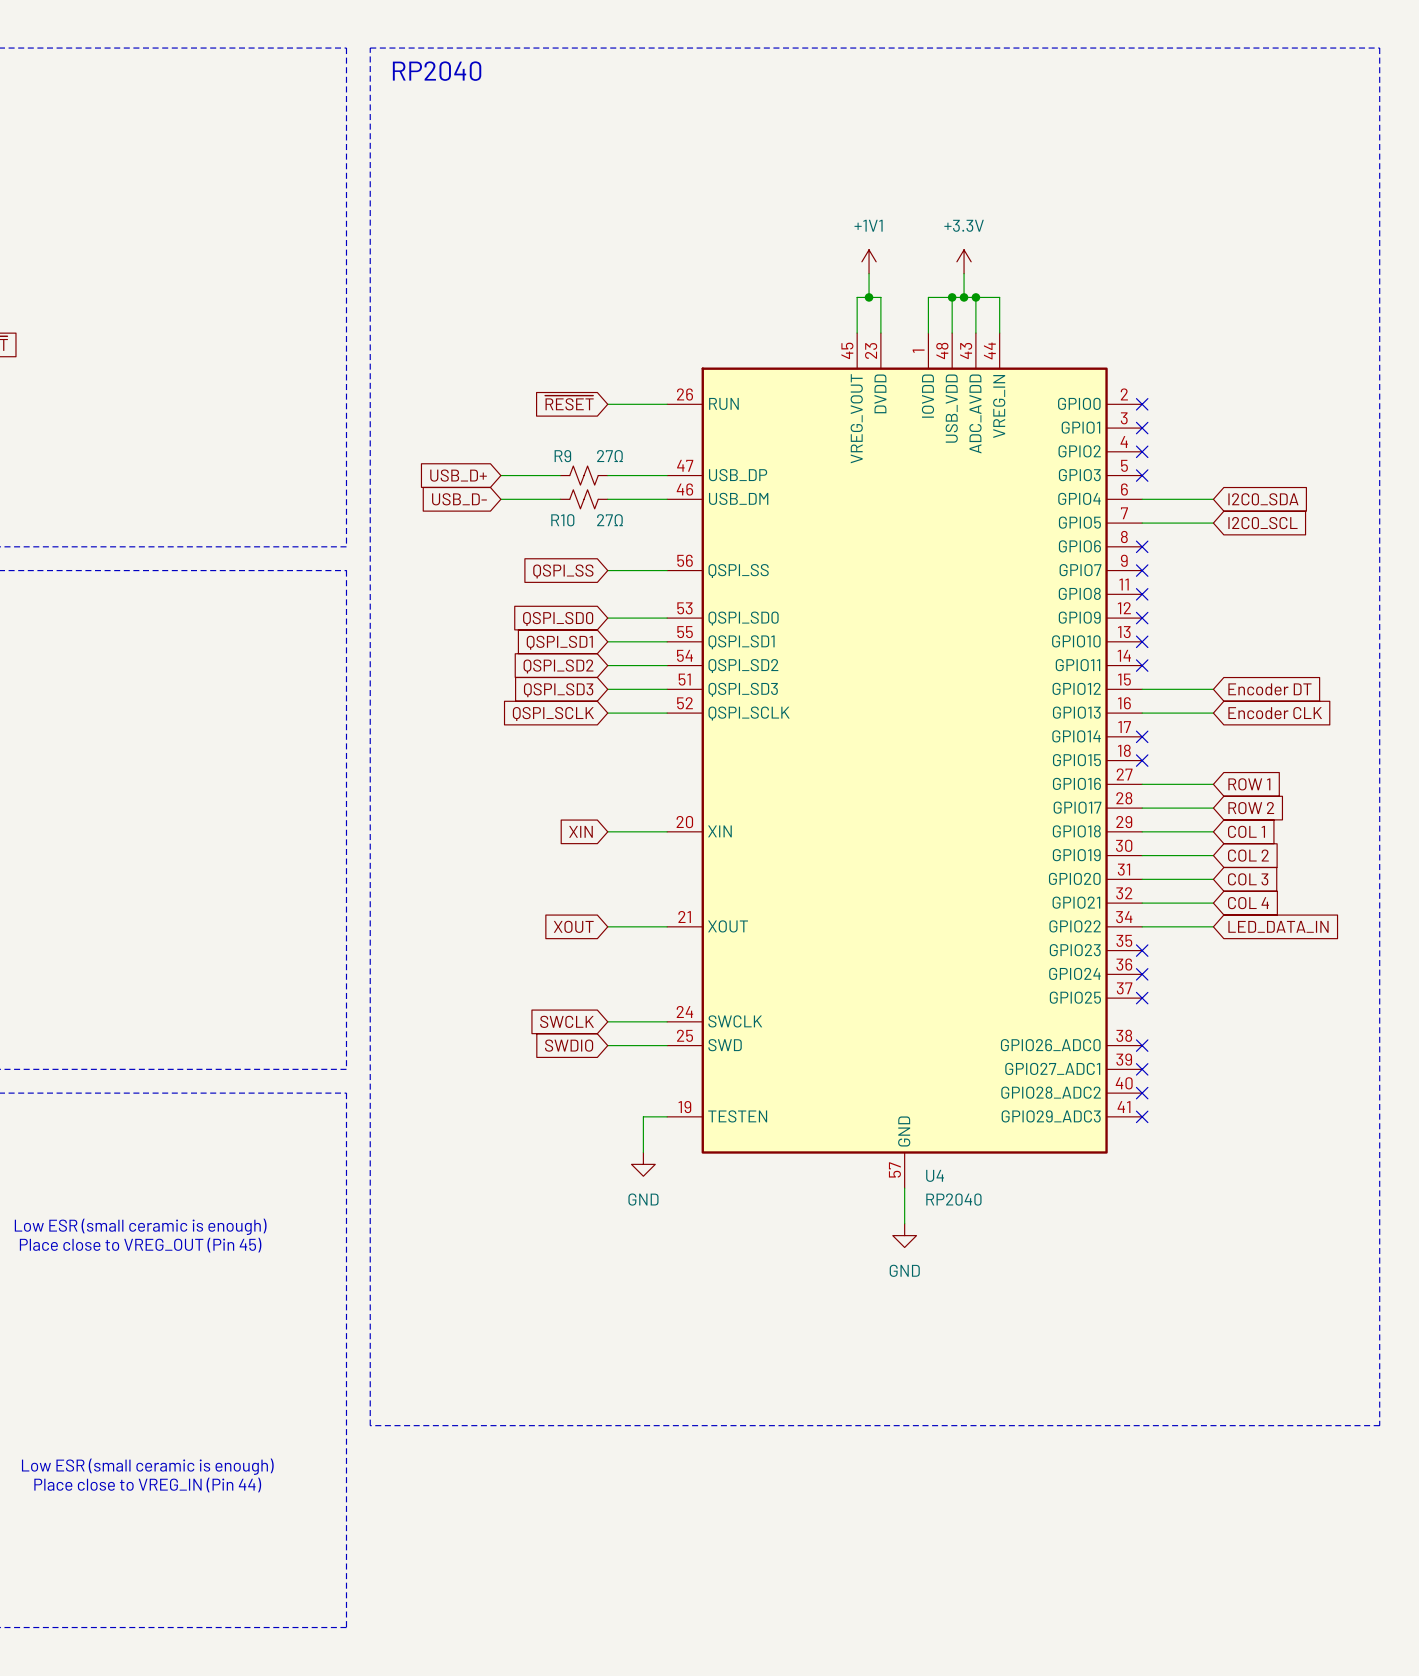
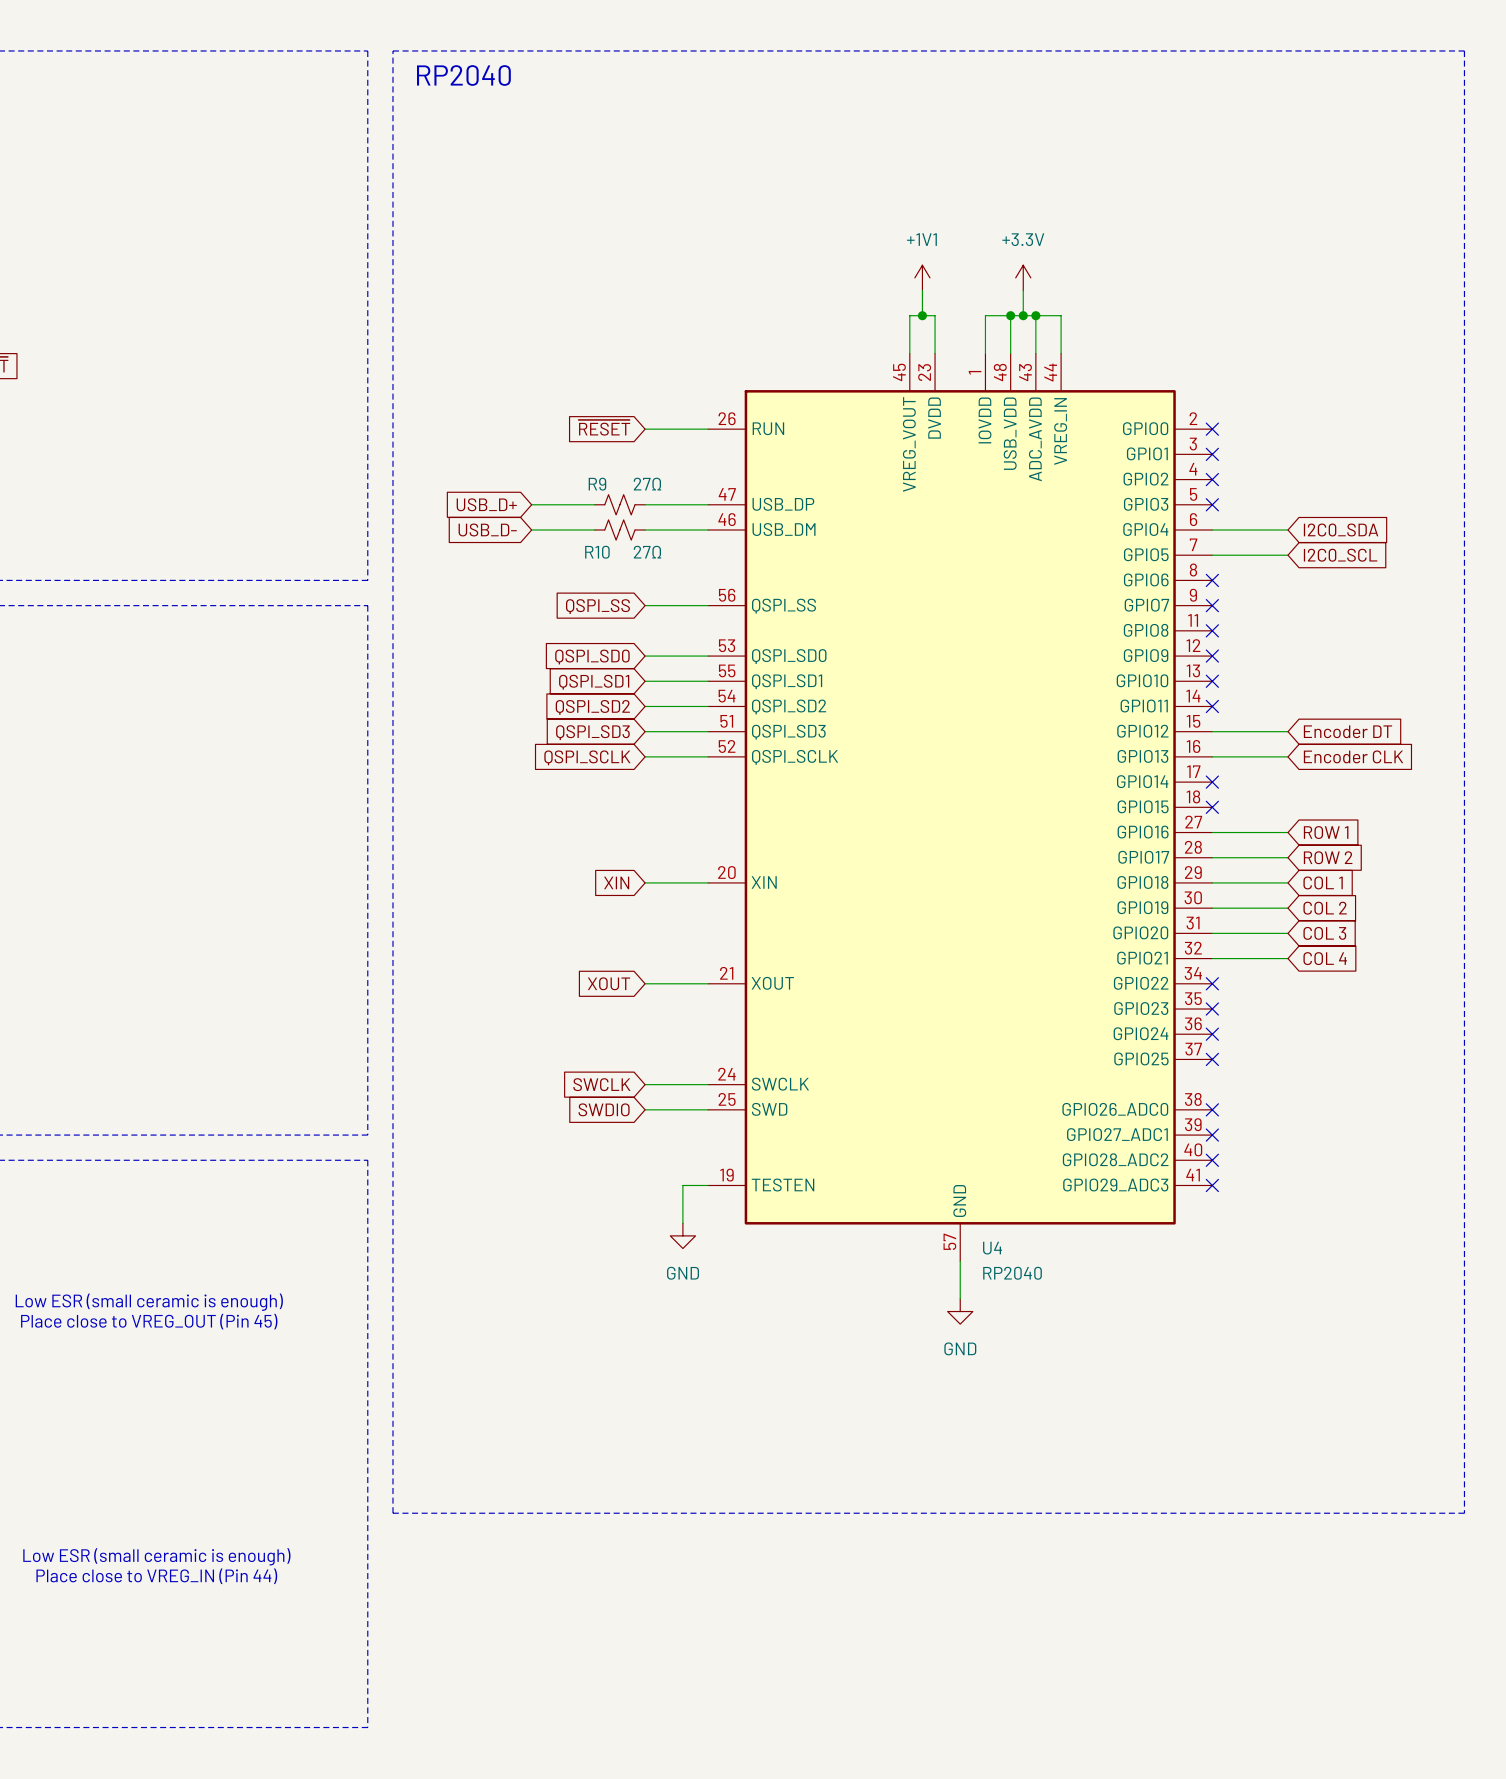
wire: (1142, 926) (1213, 926) -> none
no-connect mark: none -> (1212, 983)
global label: LED_DATA_IN (1278, 926) -> none

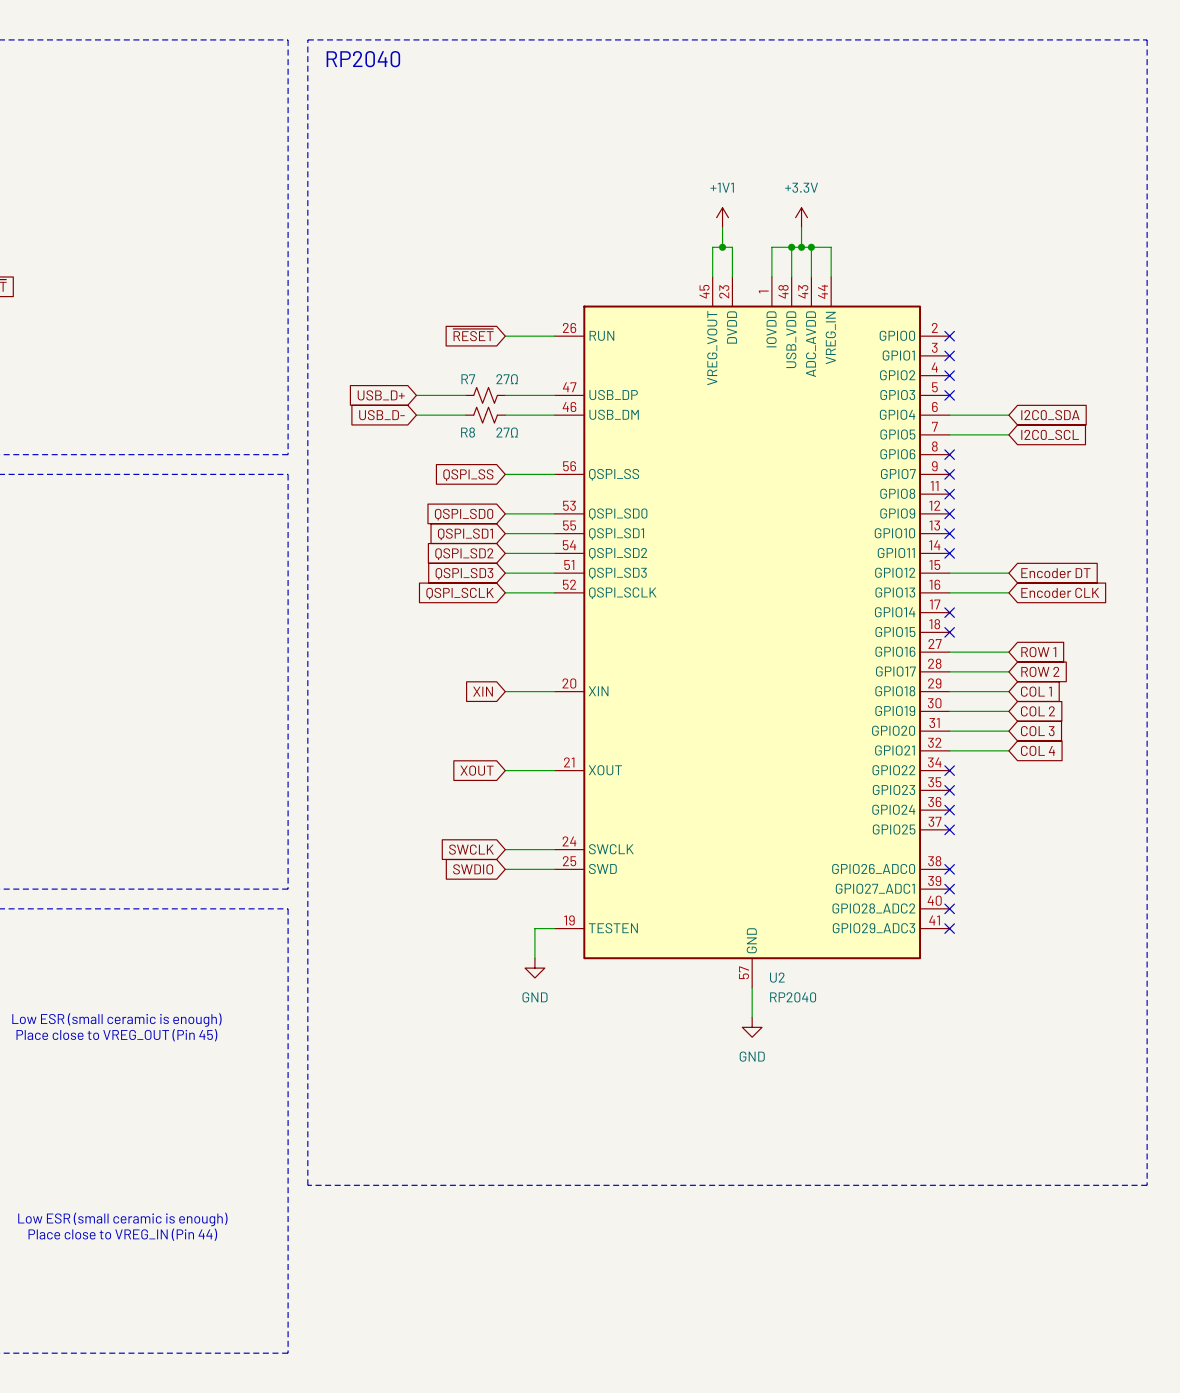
R9 name: R9 (597, 484) -> R7 (468, 379)
R10 name: R10 (597, 552) -> R8 (468, 432)
U4 name: U4 (992, 1248) -> U2 (777, 977)

